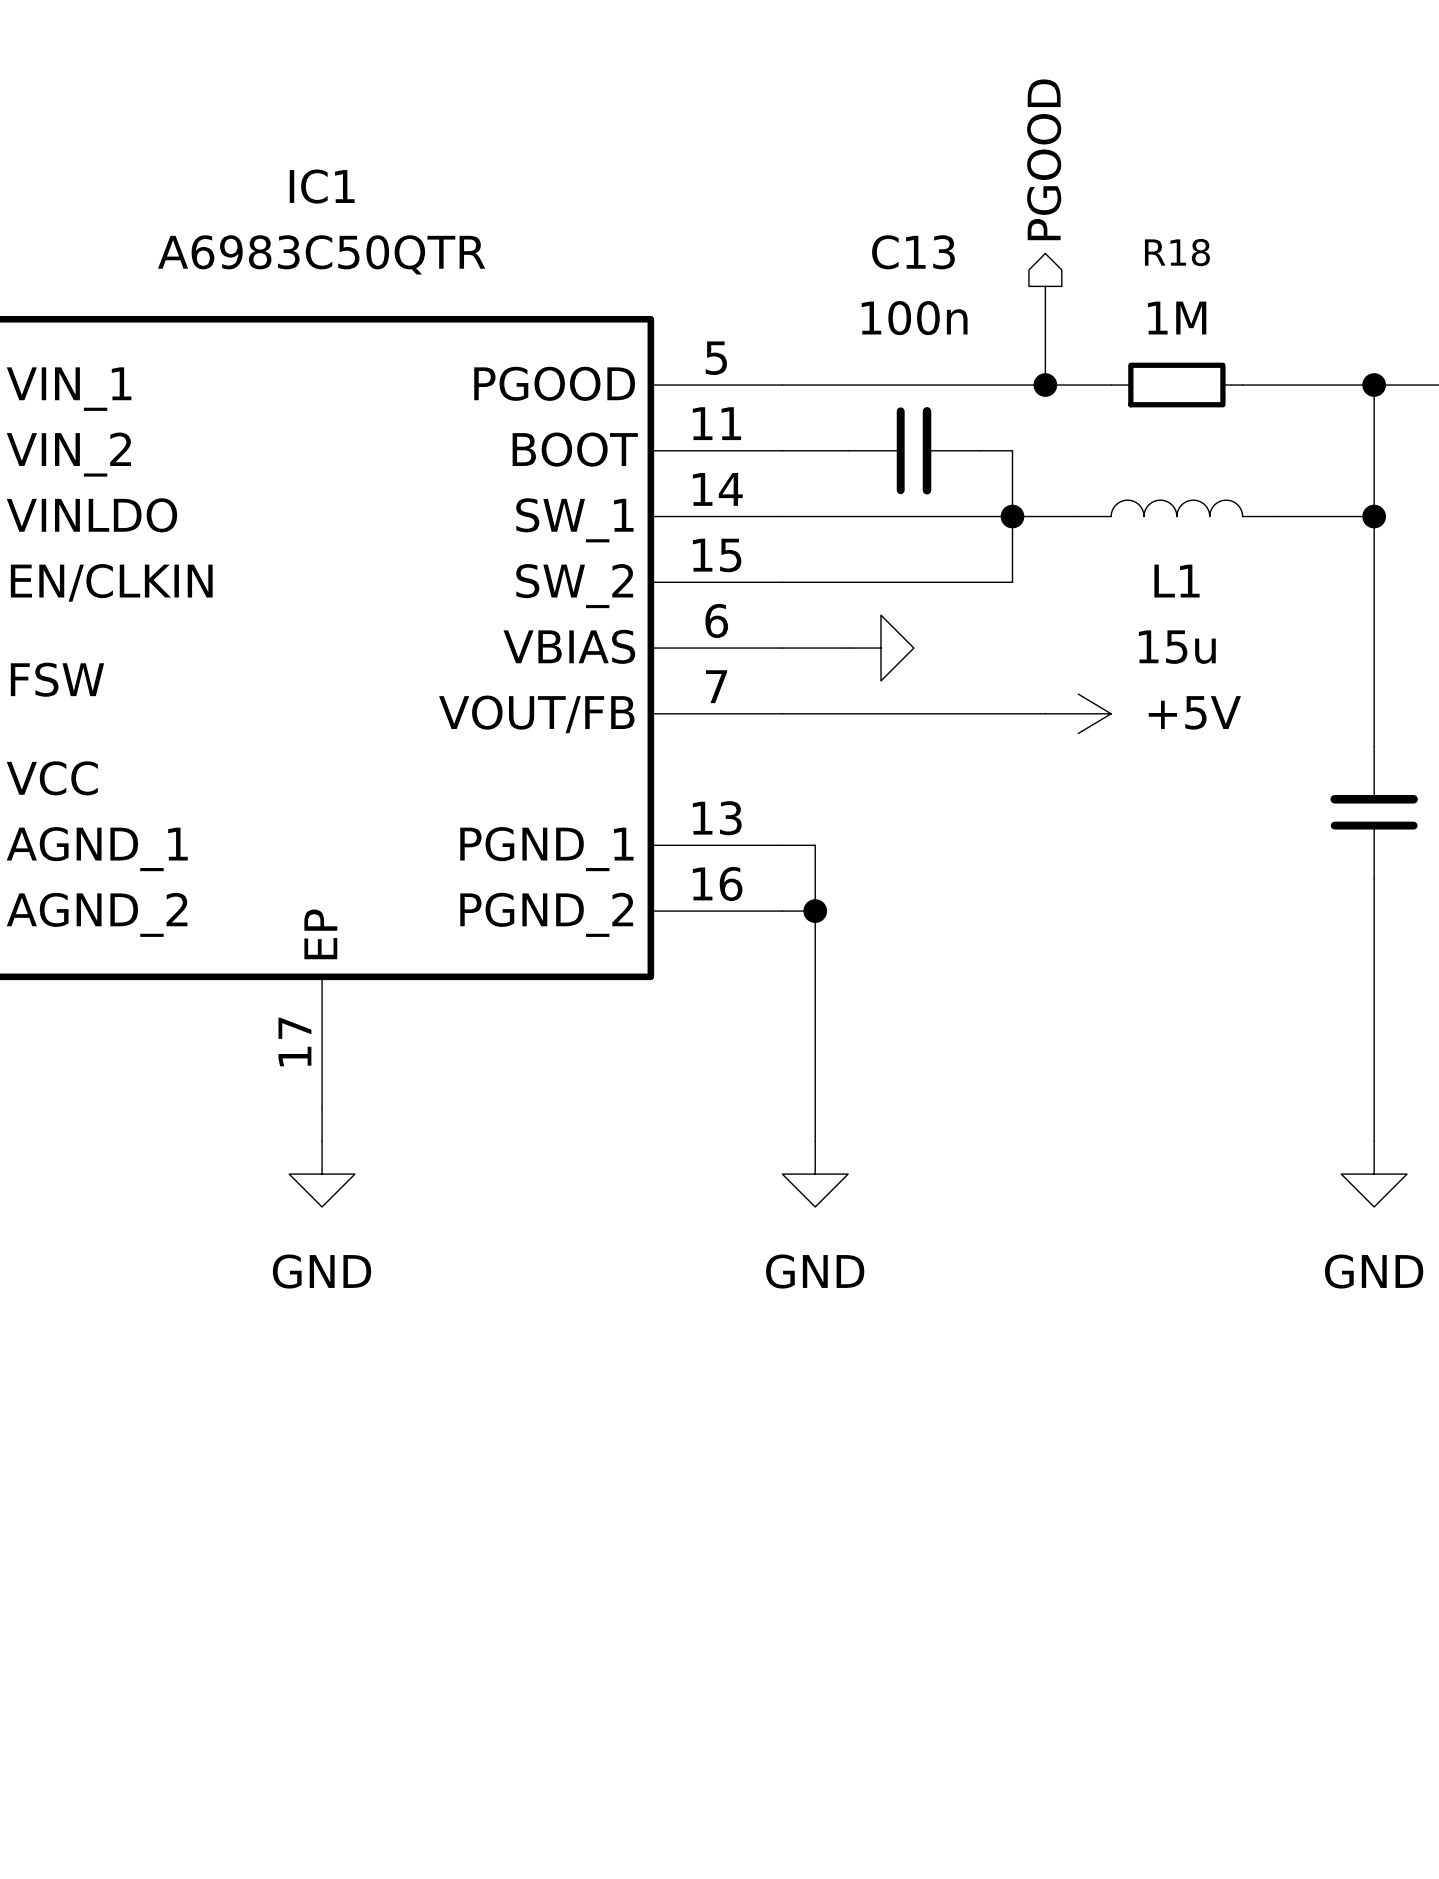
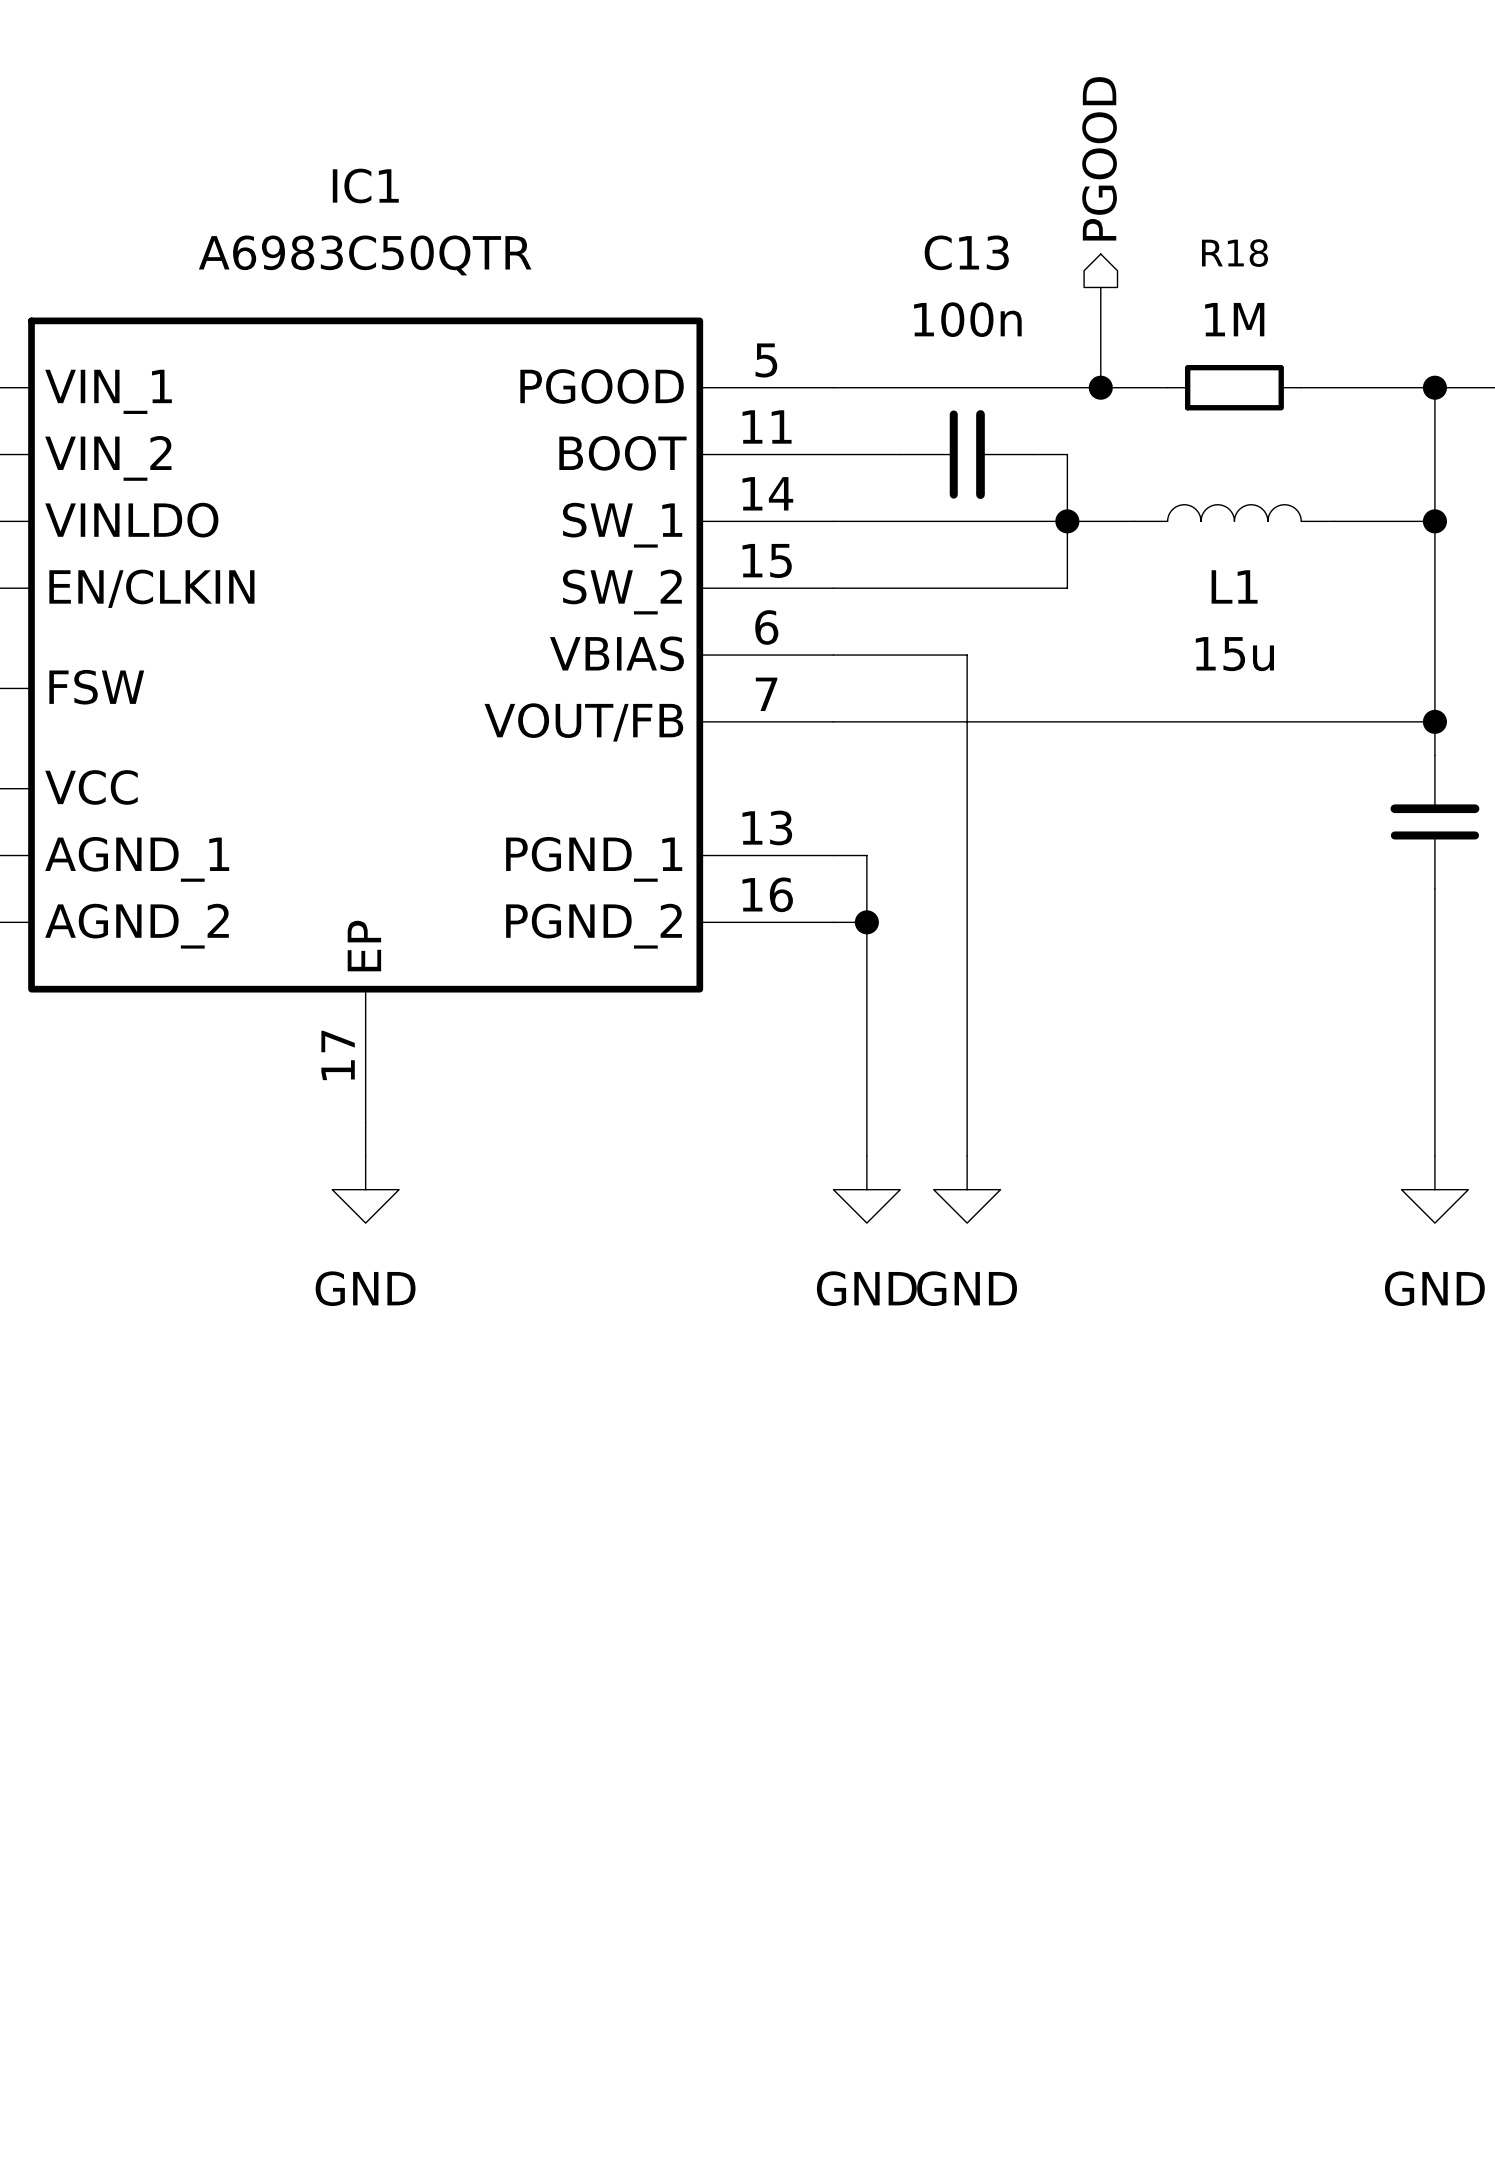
wire: none -> (900, 655) (967, 655) (967, 1156)
power symbol: (880, 648) -> none
wire: none -> (1100, 721) (1434, 721)
power symbol: +5V (1078, 713) -> none
junction: none -> (1434, 721)
power symbol: none -> GND (967, 1189)

